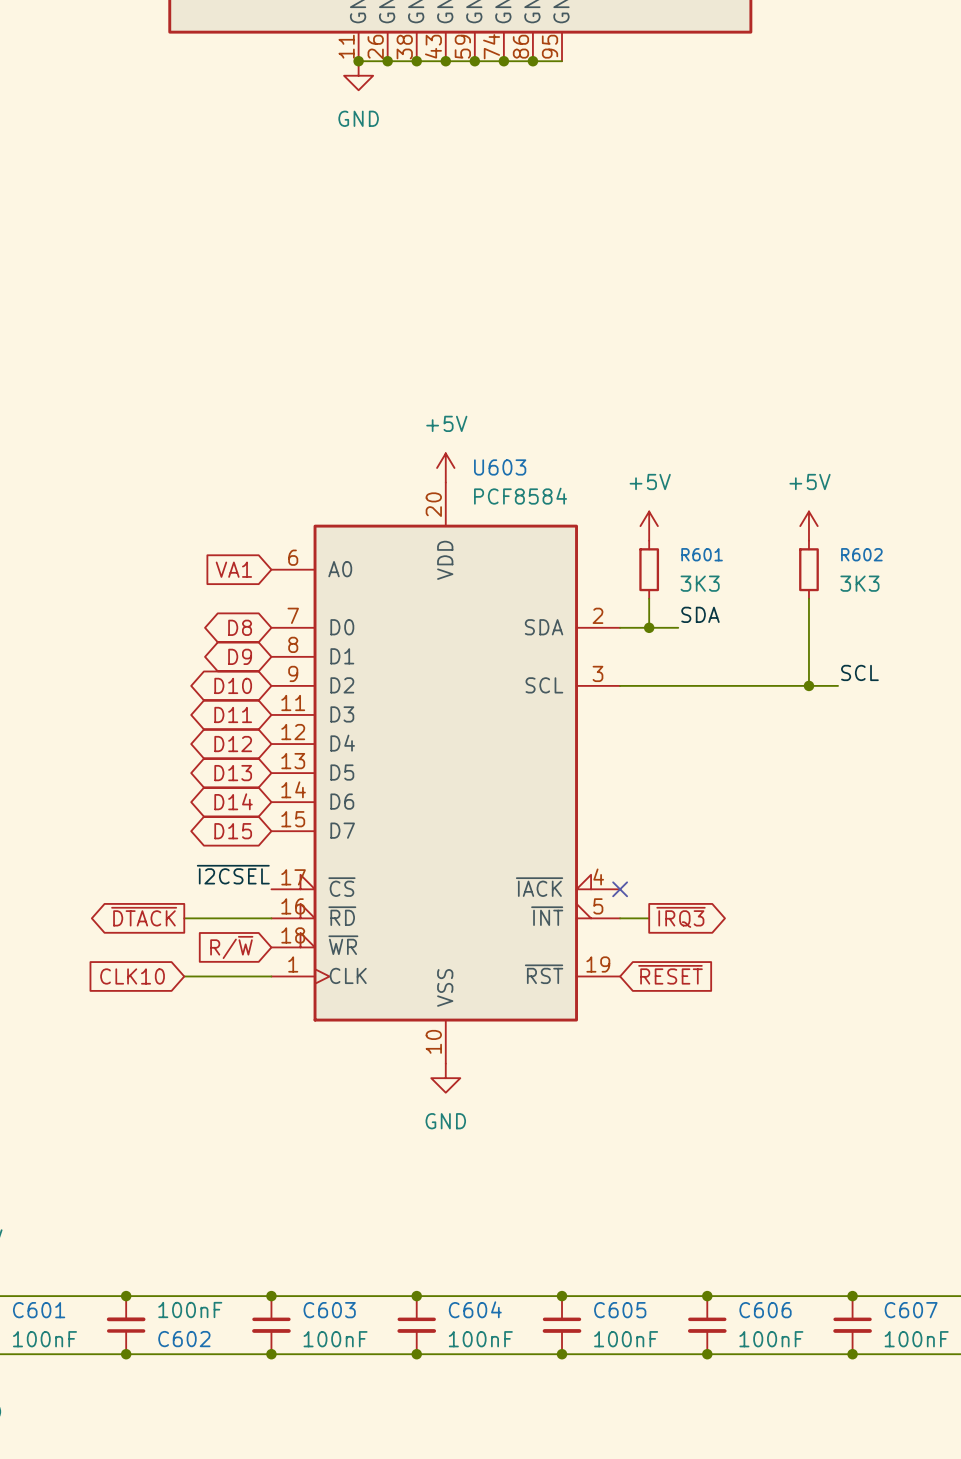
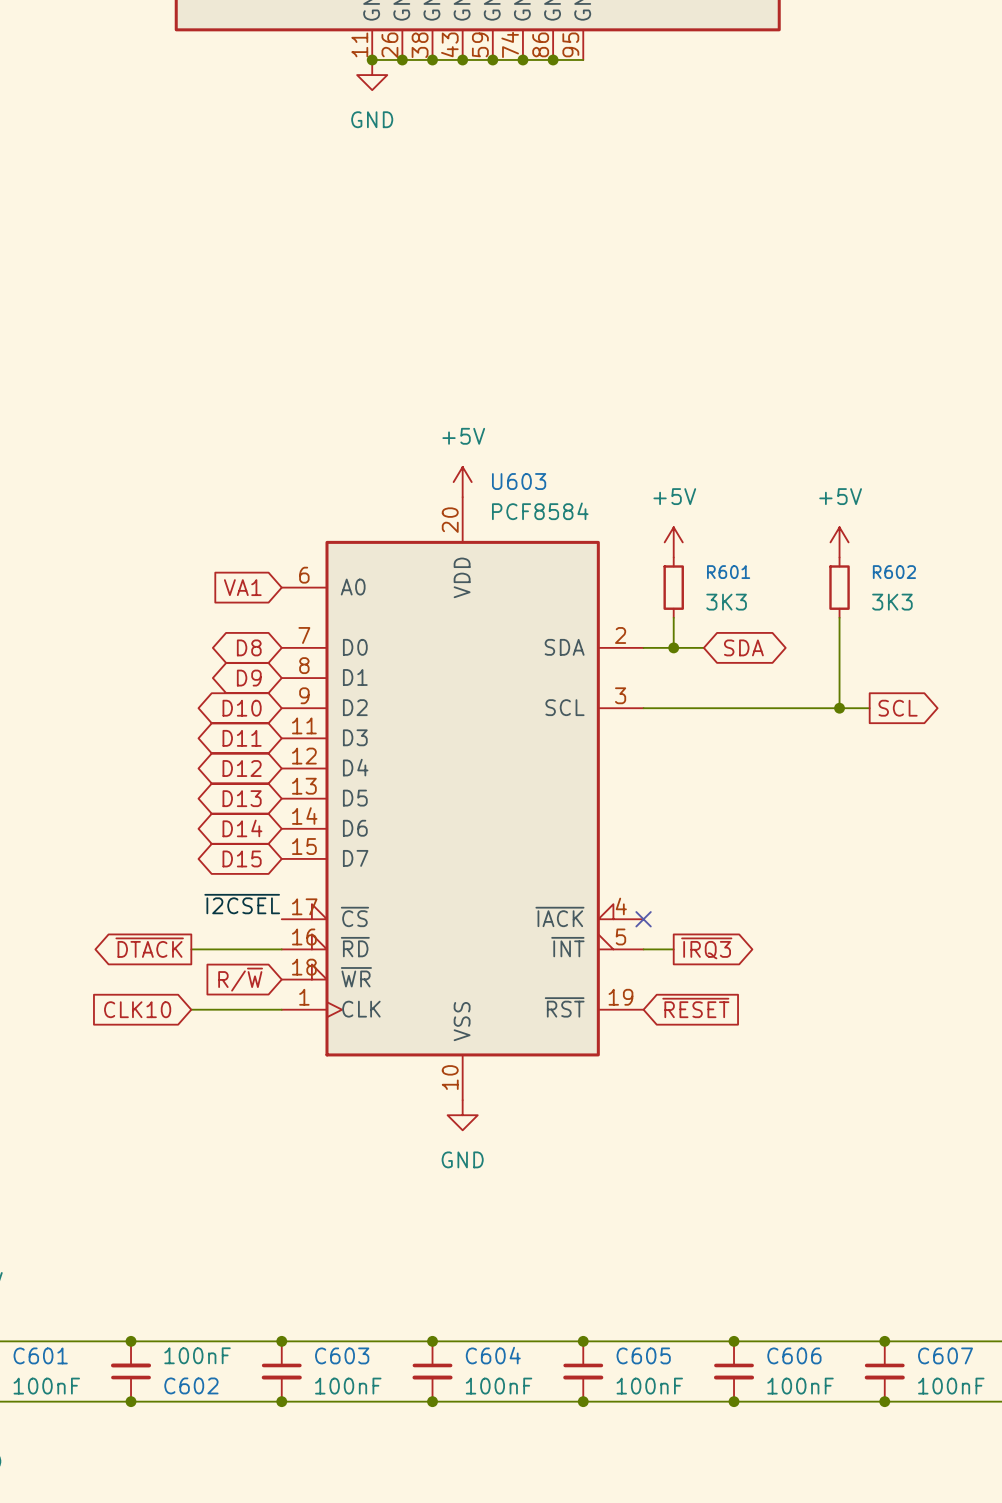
label: SDA (700, 614) -> none
global label: none -> SDA (743, 647)
label: SCL (859, 672) -> none
global label: none -> SCL (898, 708)

